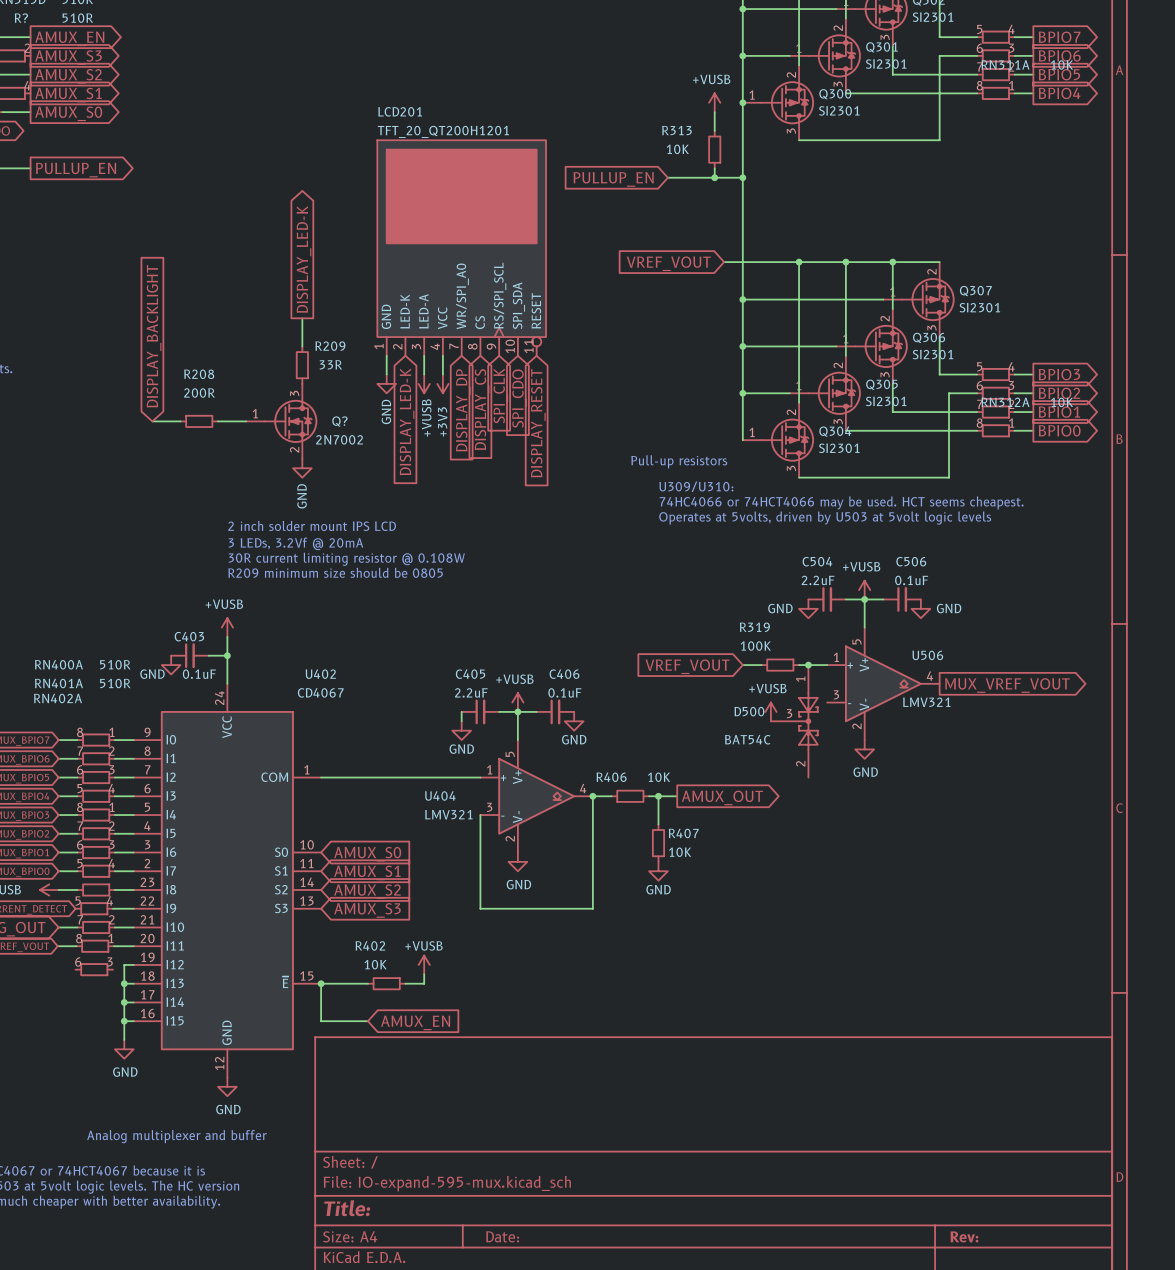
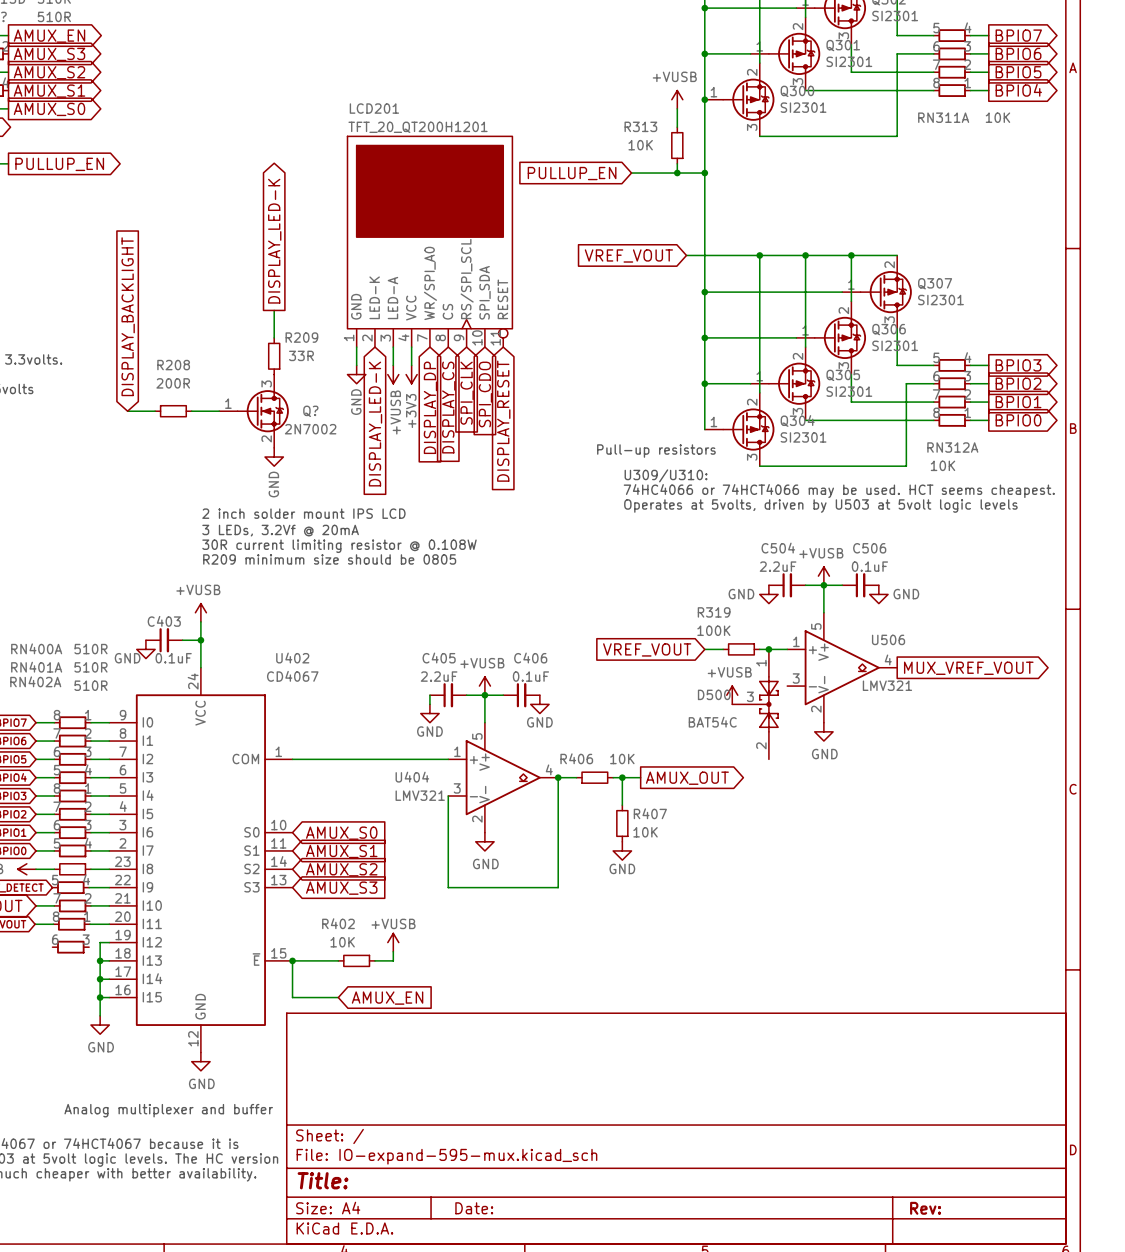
RN311A name position: RN311A (1005, 64) -> RN311A (943, 117)
RN311A value position: 10K (1062, 64) -> 10K (997, 117)
RN312A name position: RN312A (1005, 402) -> RN312A (952, 447)
RN312A value position: 10K (1062, 402) -> 10K (943, 465)
part value: none -> 510R (90, 685)

